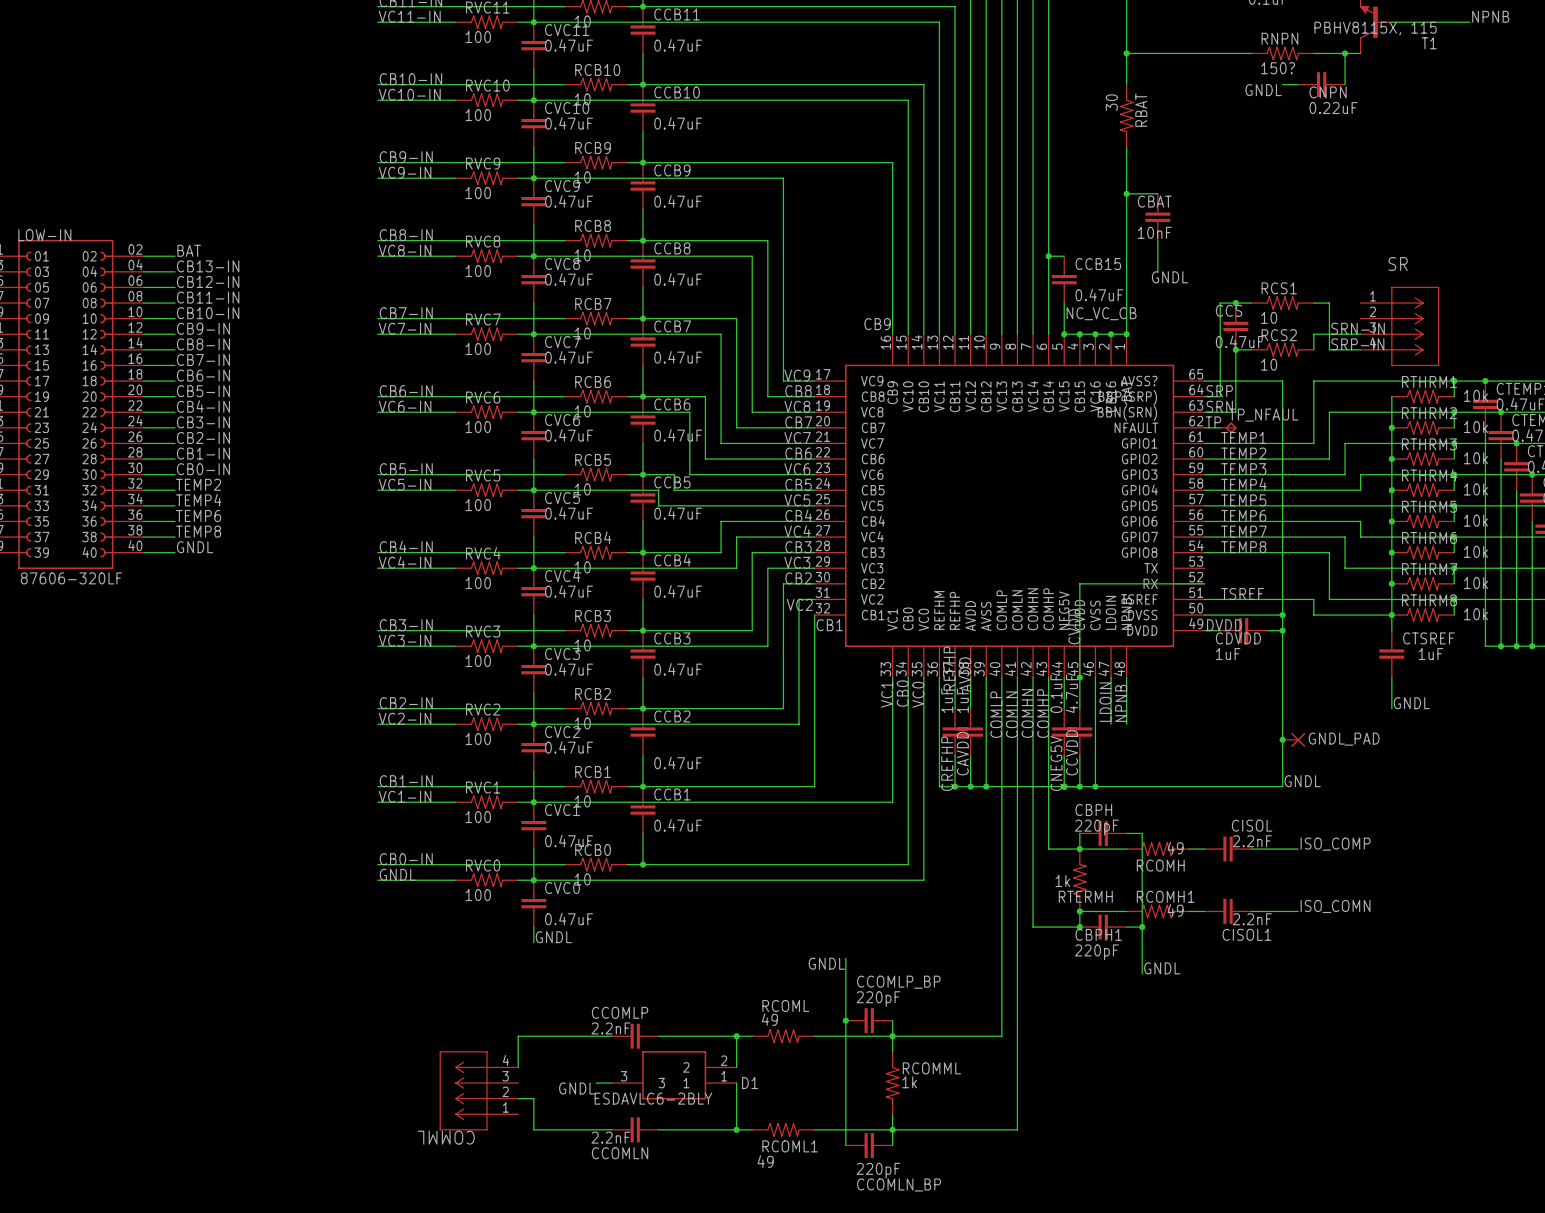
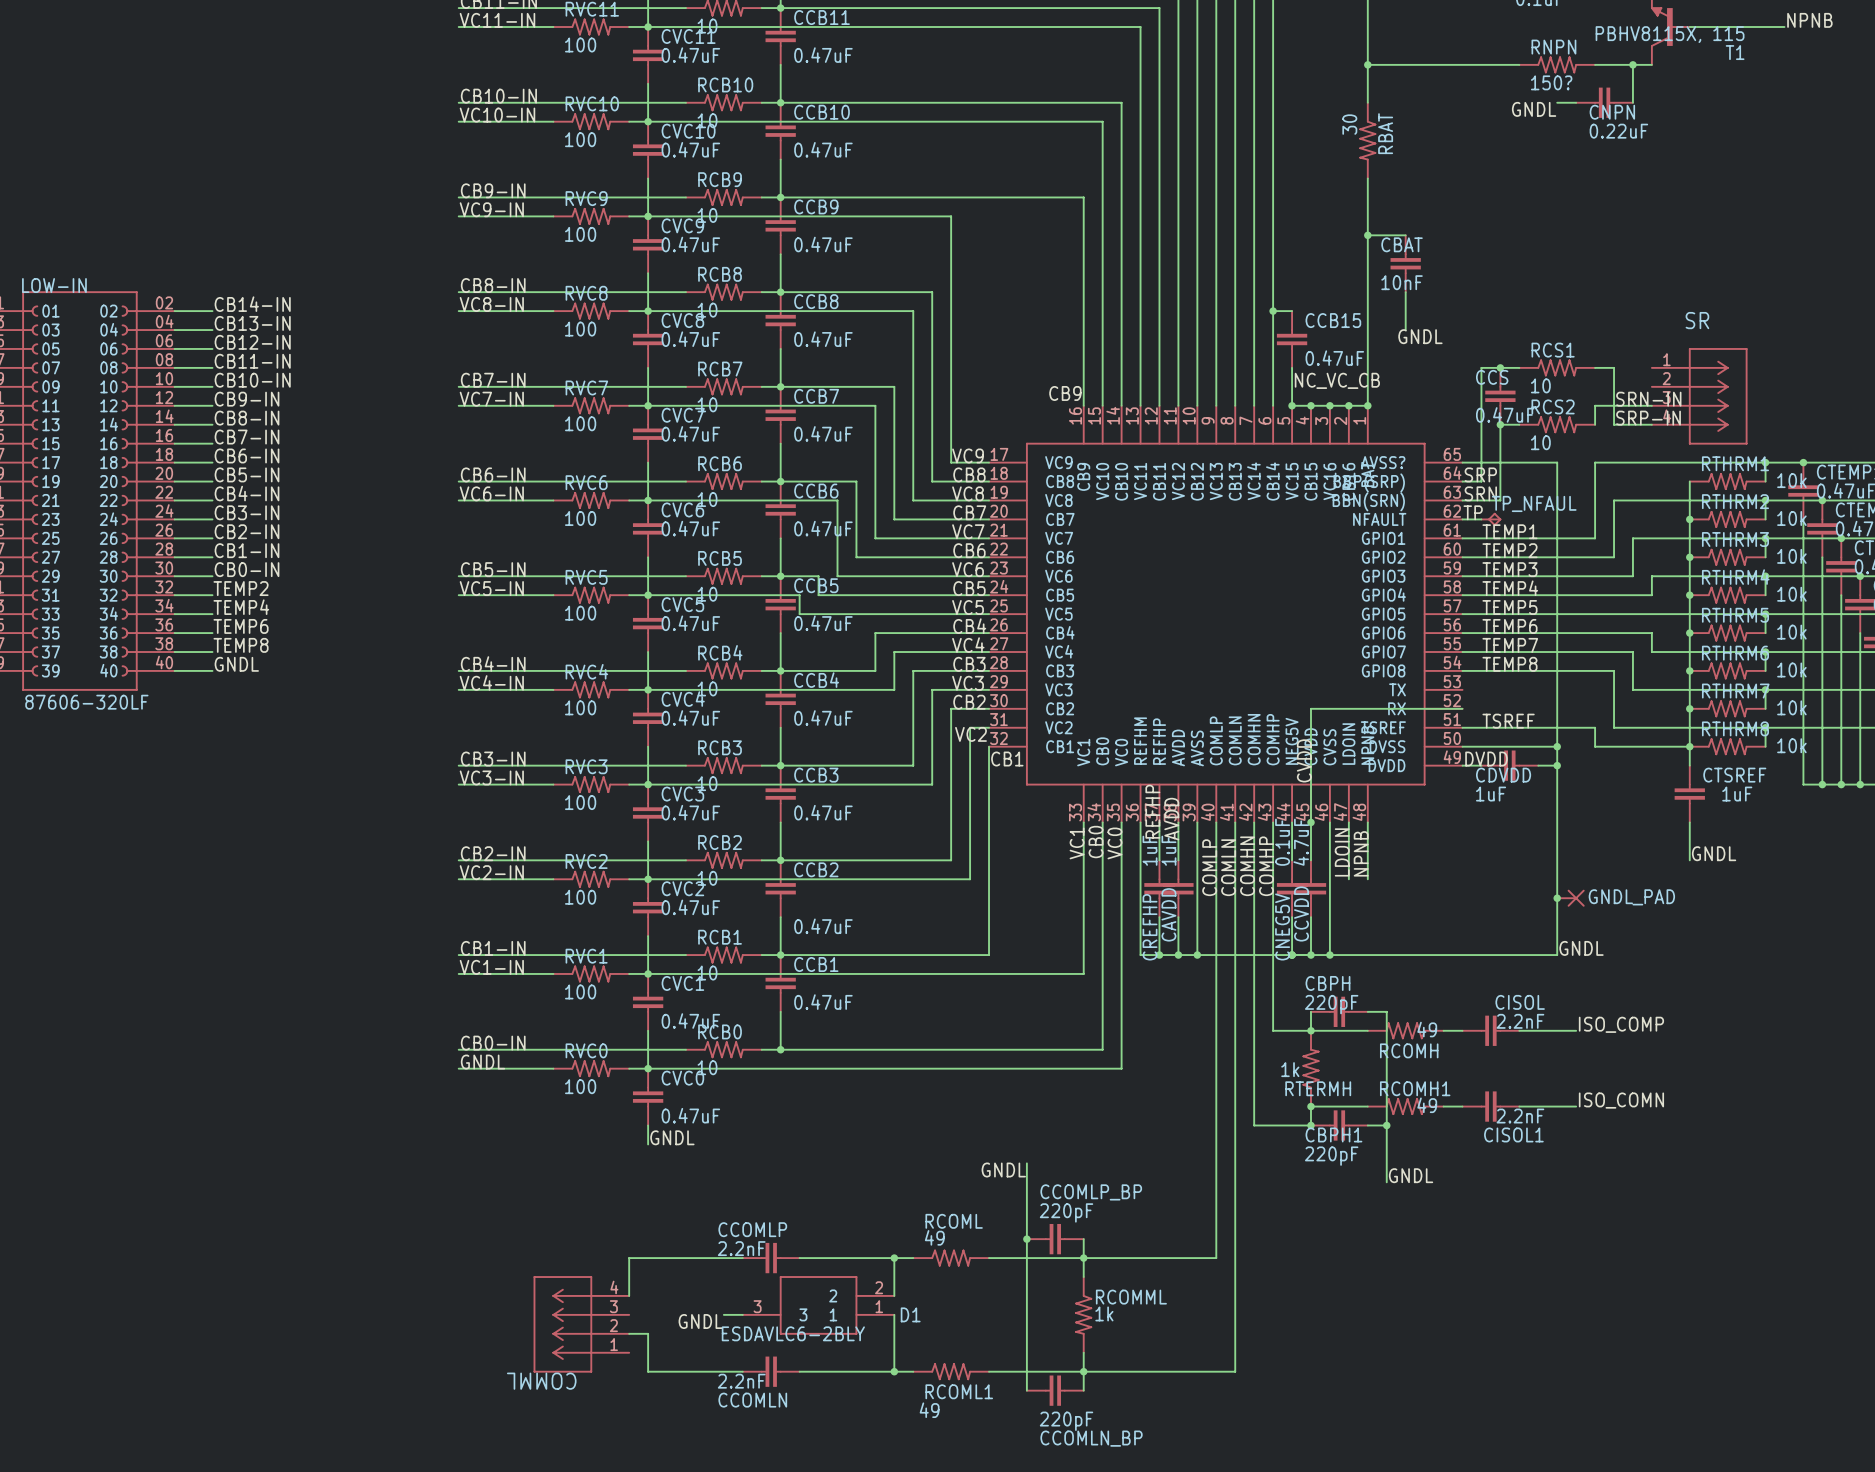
label: BAT (189, 250) -> CB14-IN (252, 304)

